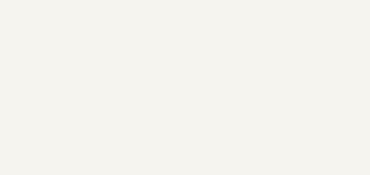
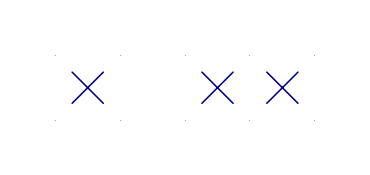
no-connect mark: none -> (87, 87)
no-connect mark: none -> (217, 87)
no-connect mark: none -> (282, 87)

